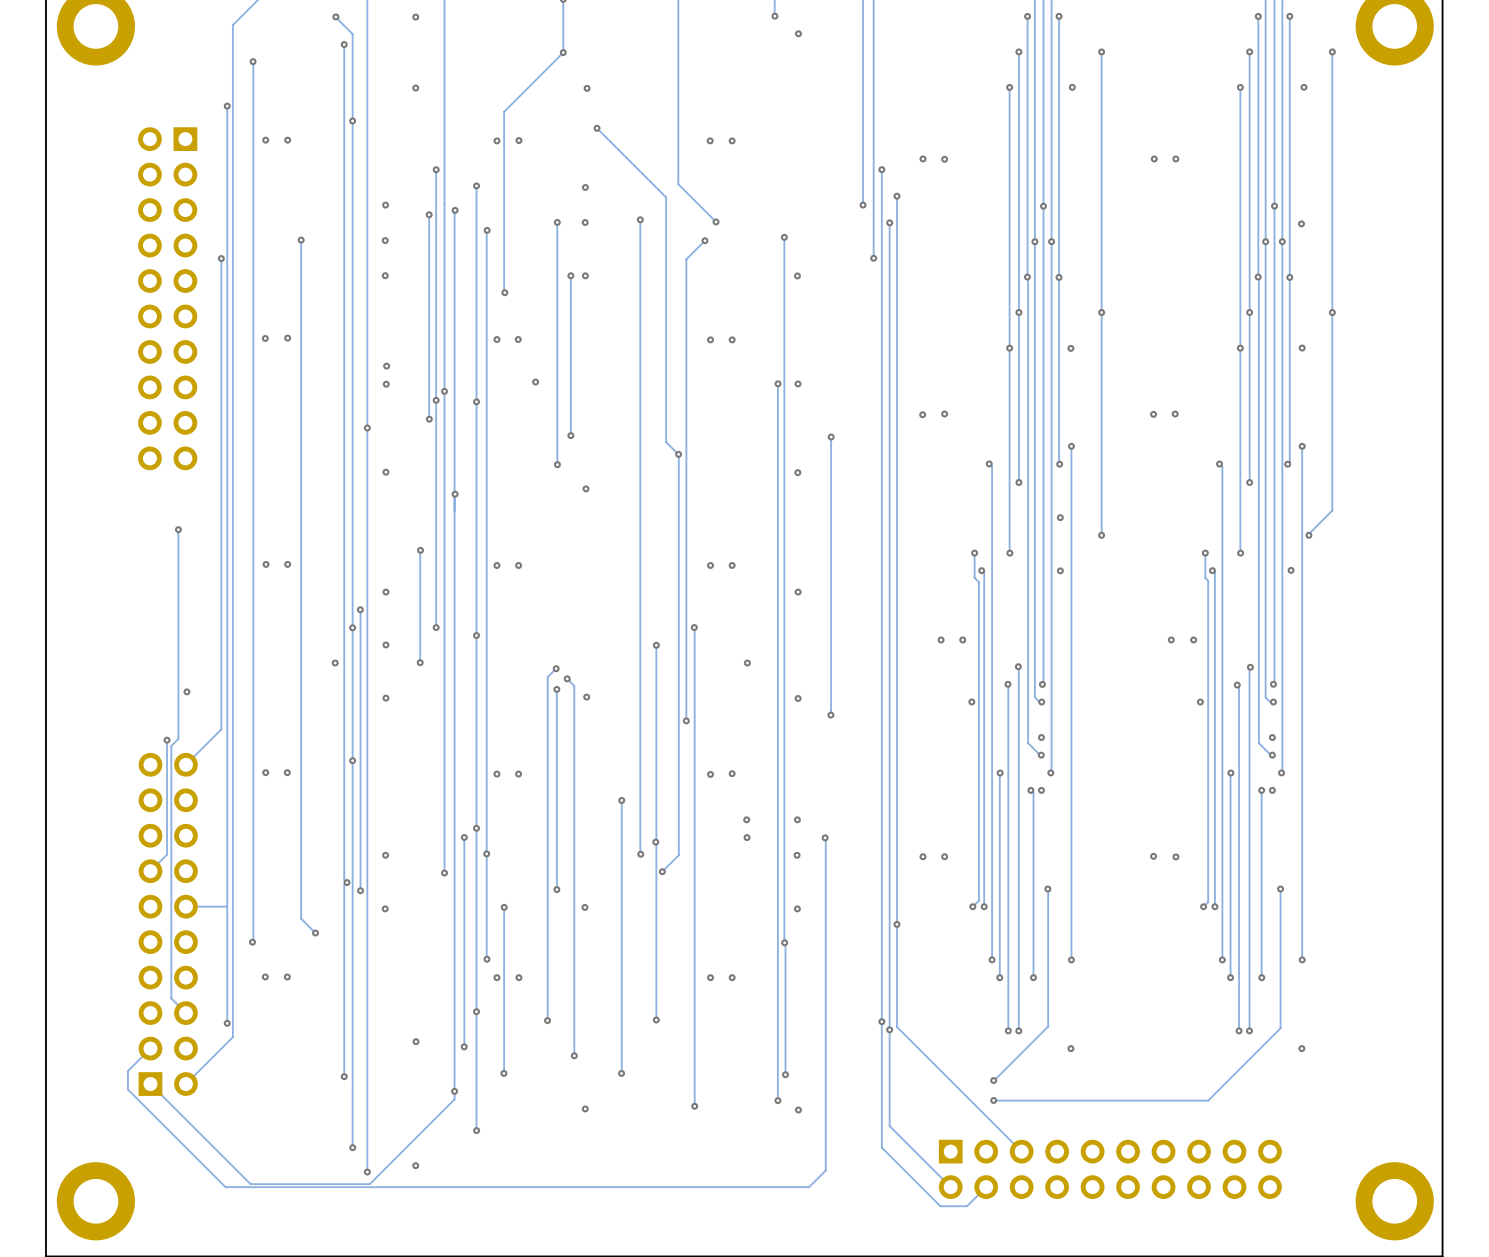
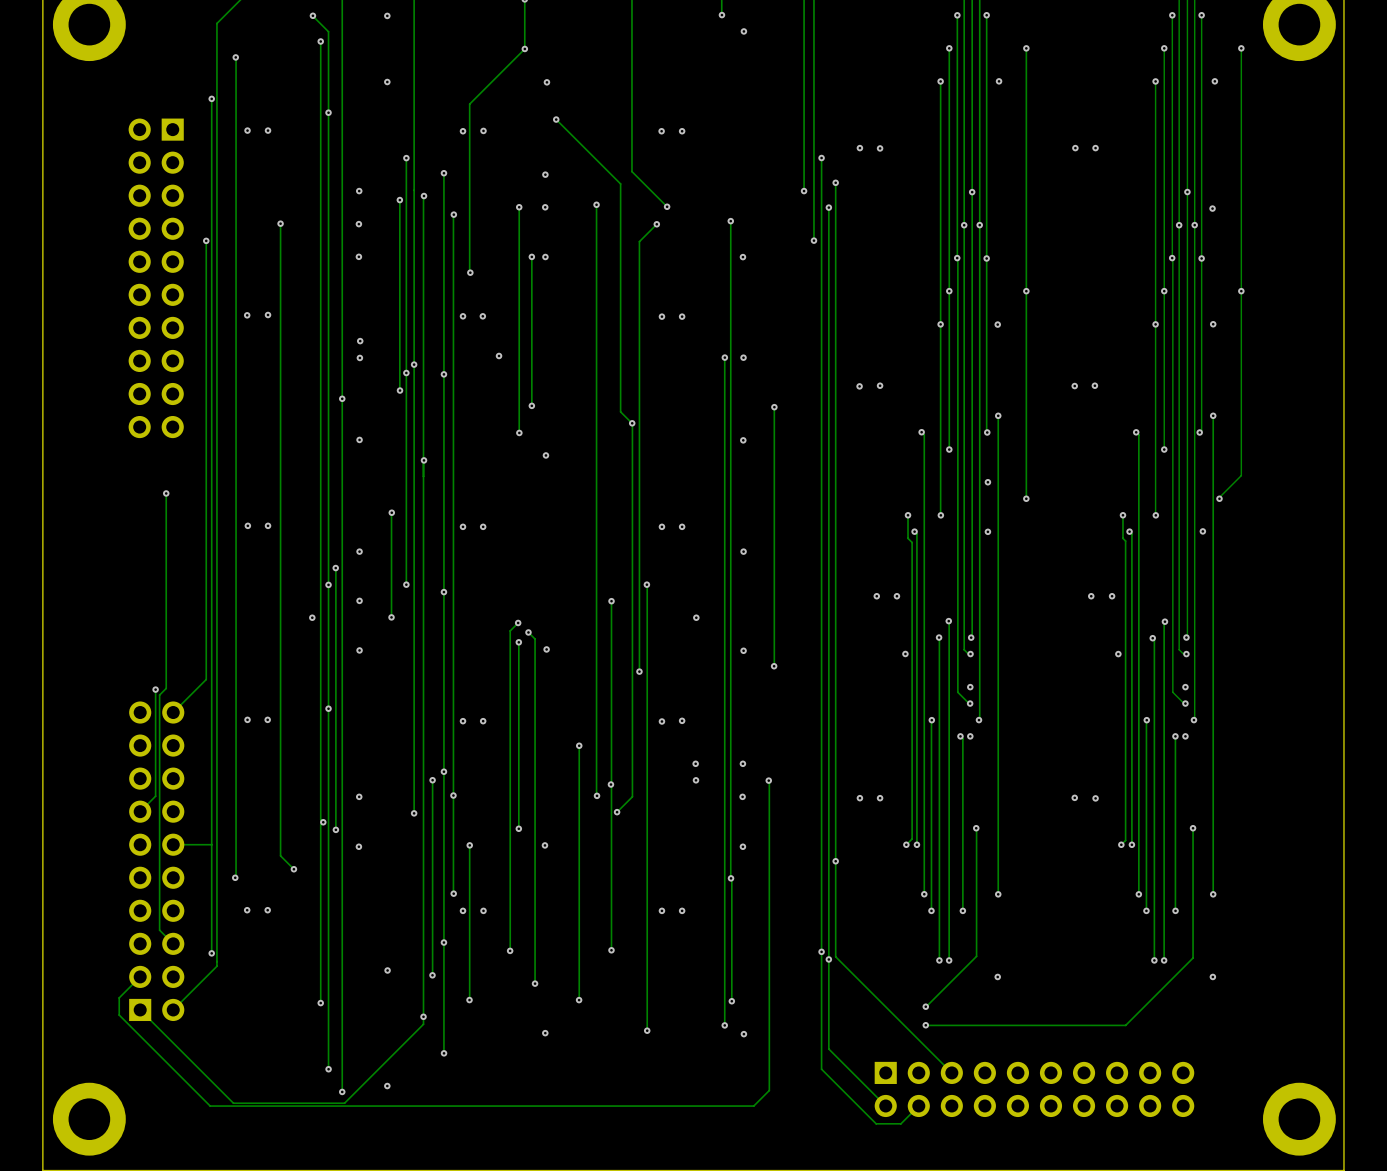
via: (186, 691) -> none

